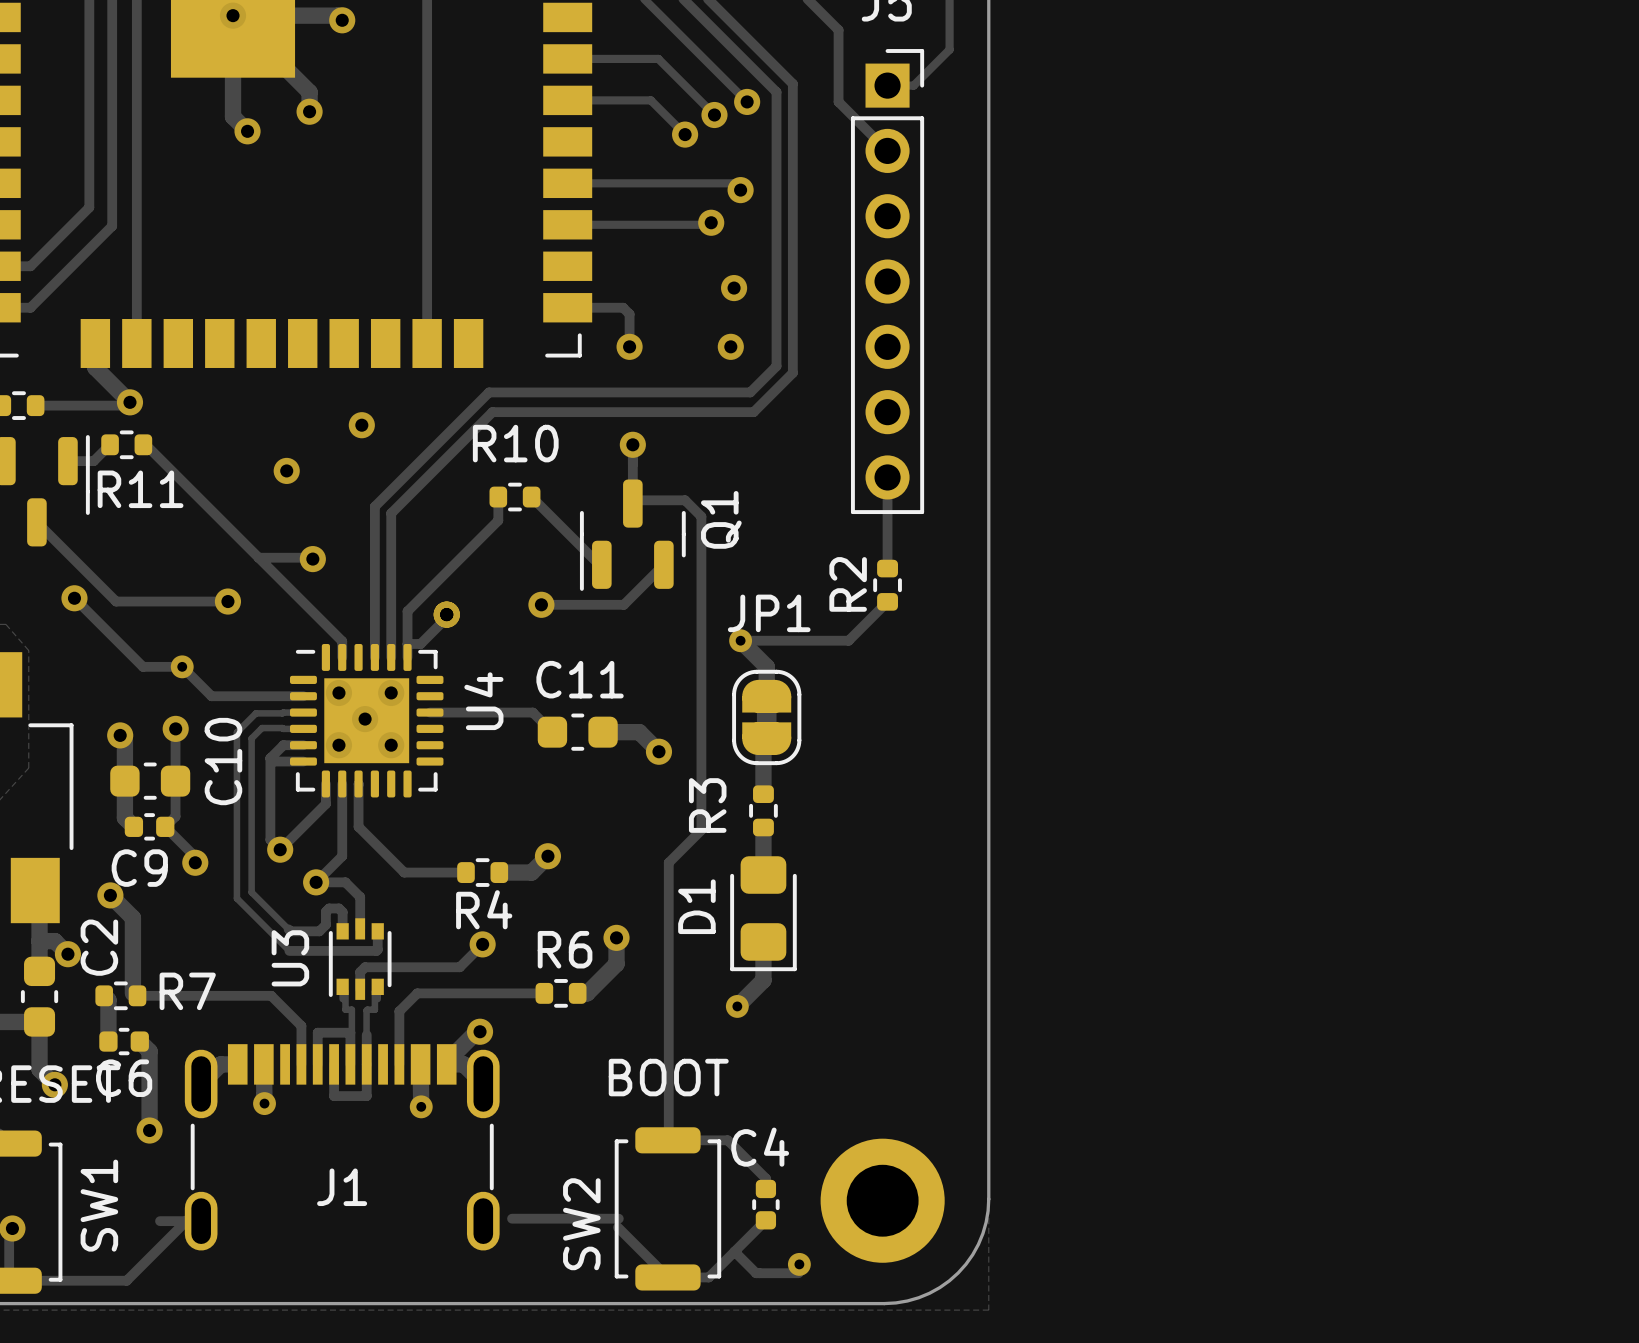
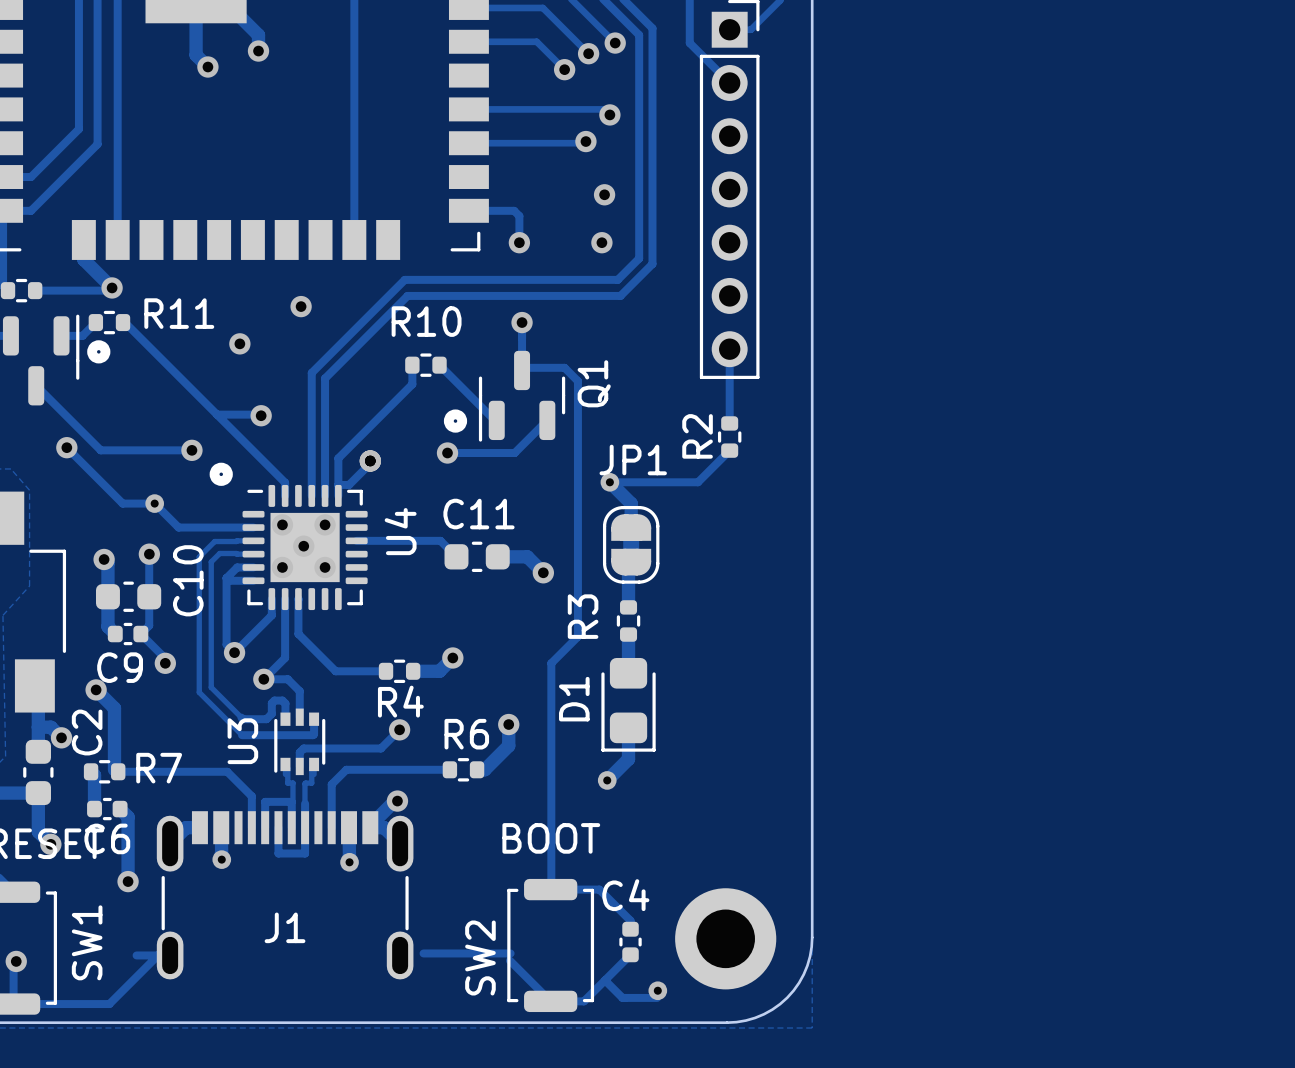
drawing: none -> [87, 340, 111, 364]
R11 name position: R11 (140, 489) -> R11 (179, 313)
drawing: none -> [443, 409, 468, 433]
drawing: none -> [209, 462, 233, 486]

